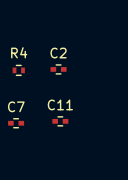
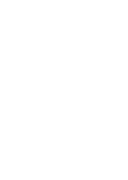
C2: (58, 69) -> none
R4: (18, 70) -> none
C11: (60, 121) -> none
C7: (16, 123) -> none

